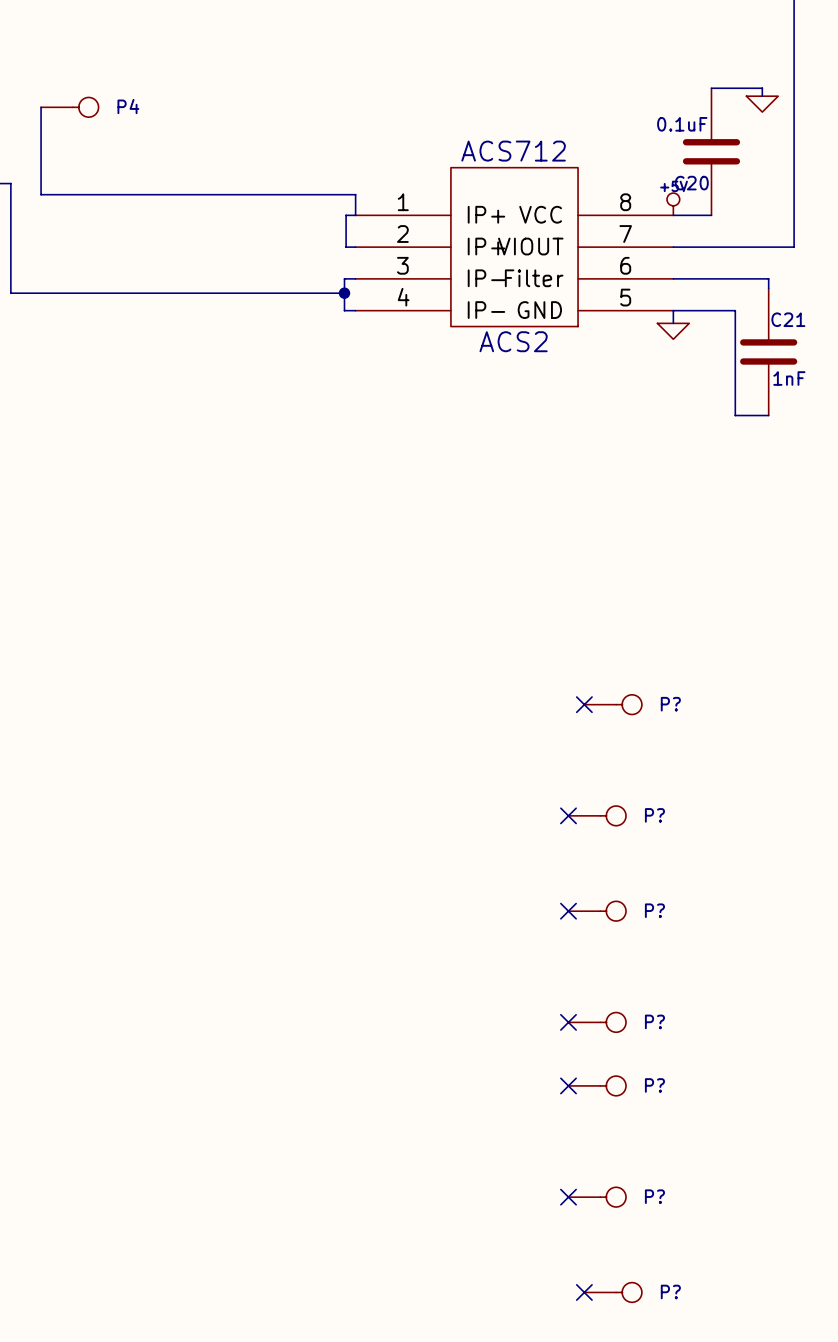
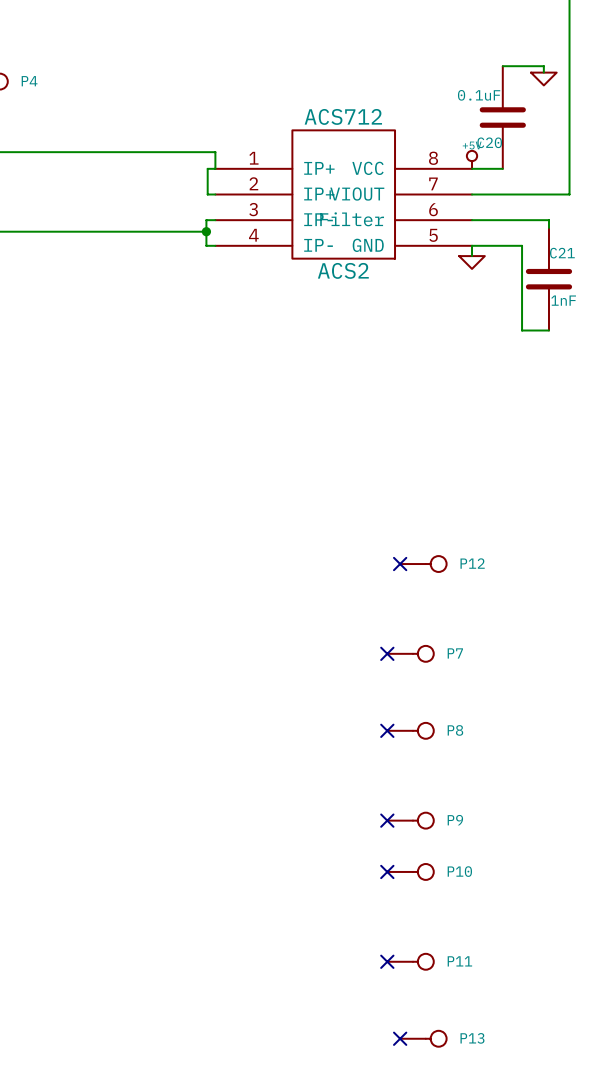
P? name: P? (670, 704) -> P12 (472, 563)
P? name: P? (654, 815) -> P7 (455, 653)
P? name: P? (654, 910) -> P8 (455, 730)
P? name: P? (654, 1021) -> P9 (455, 820)
P? name: P? (654, 1085) -> P10 (459, 871)
P? name: P? (654, 1196) -> P11 (459, 961)
P? name: P? (670, 1291) -> P13 (472, 1038)

